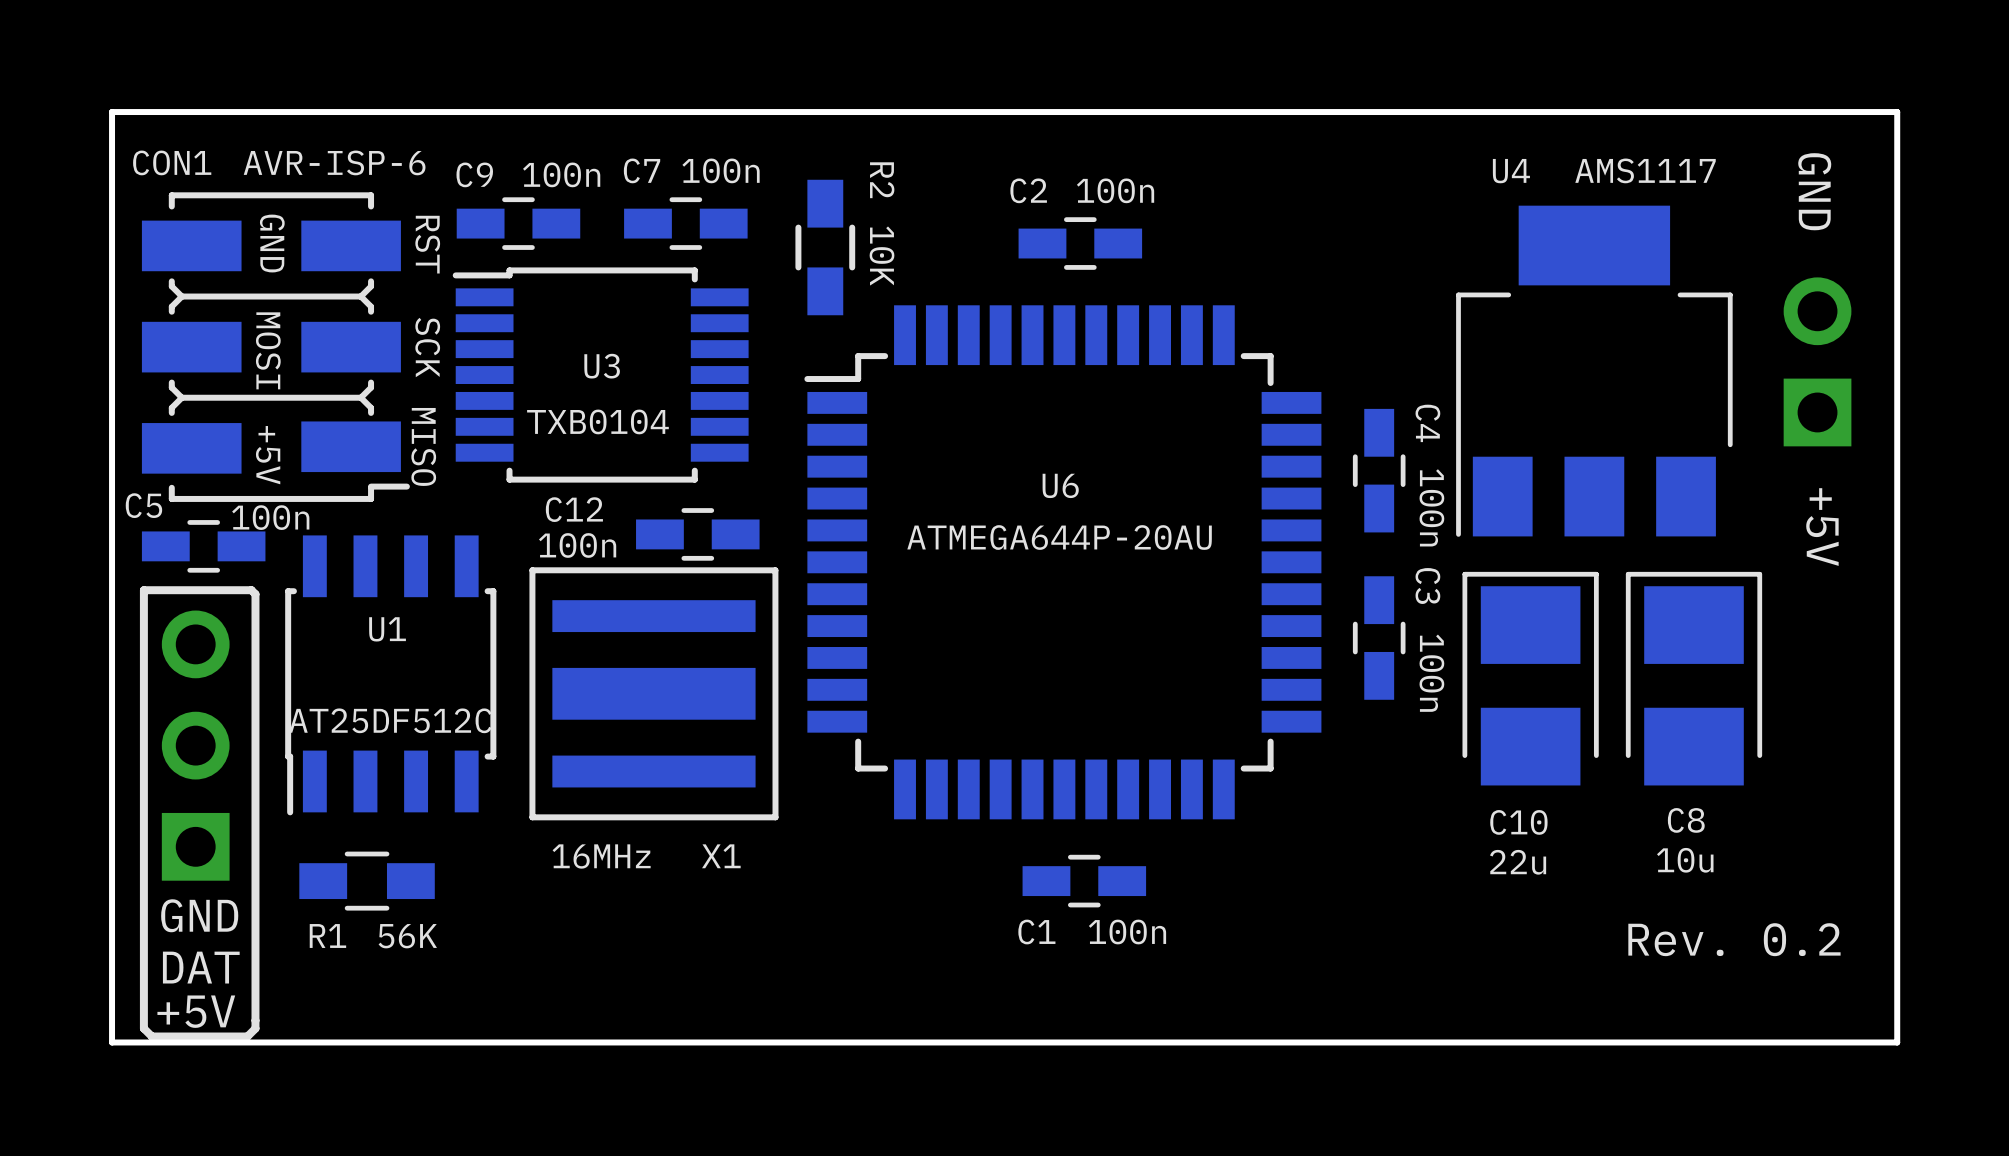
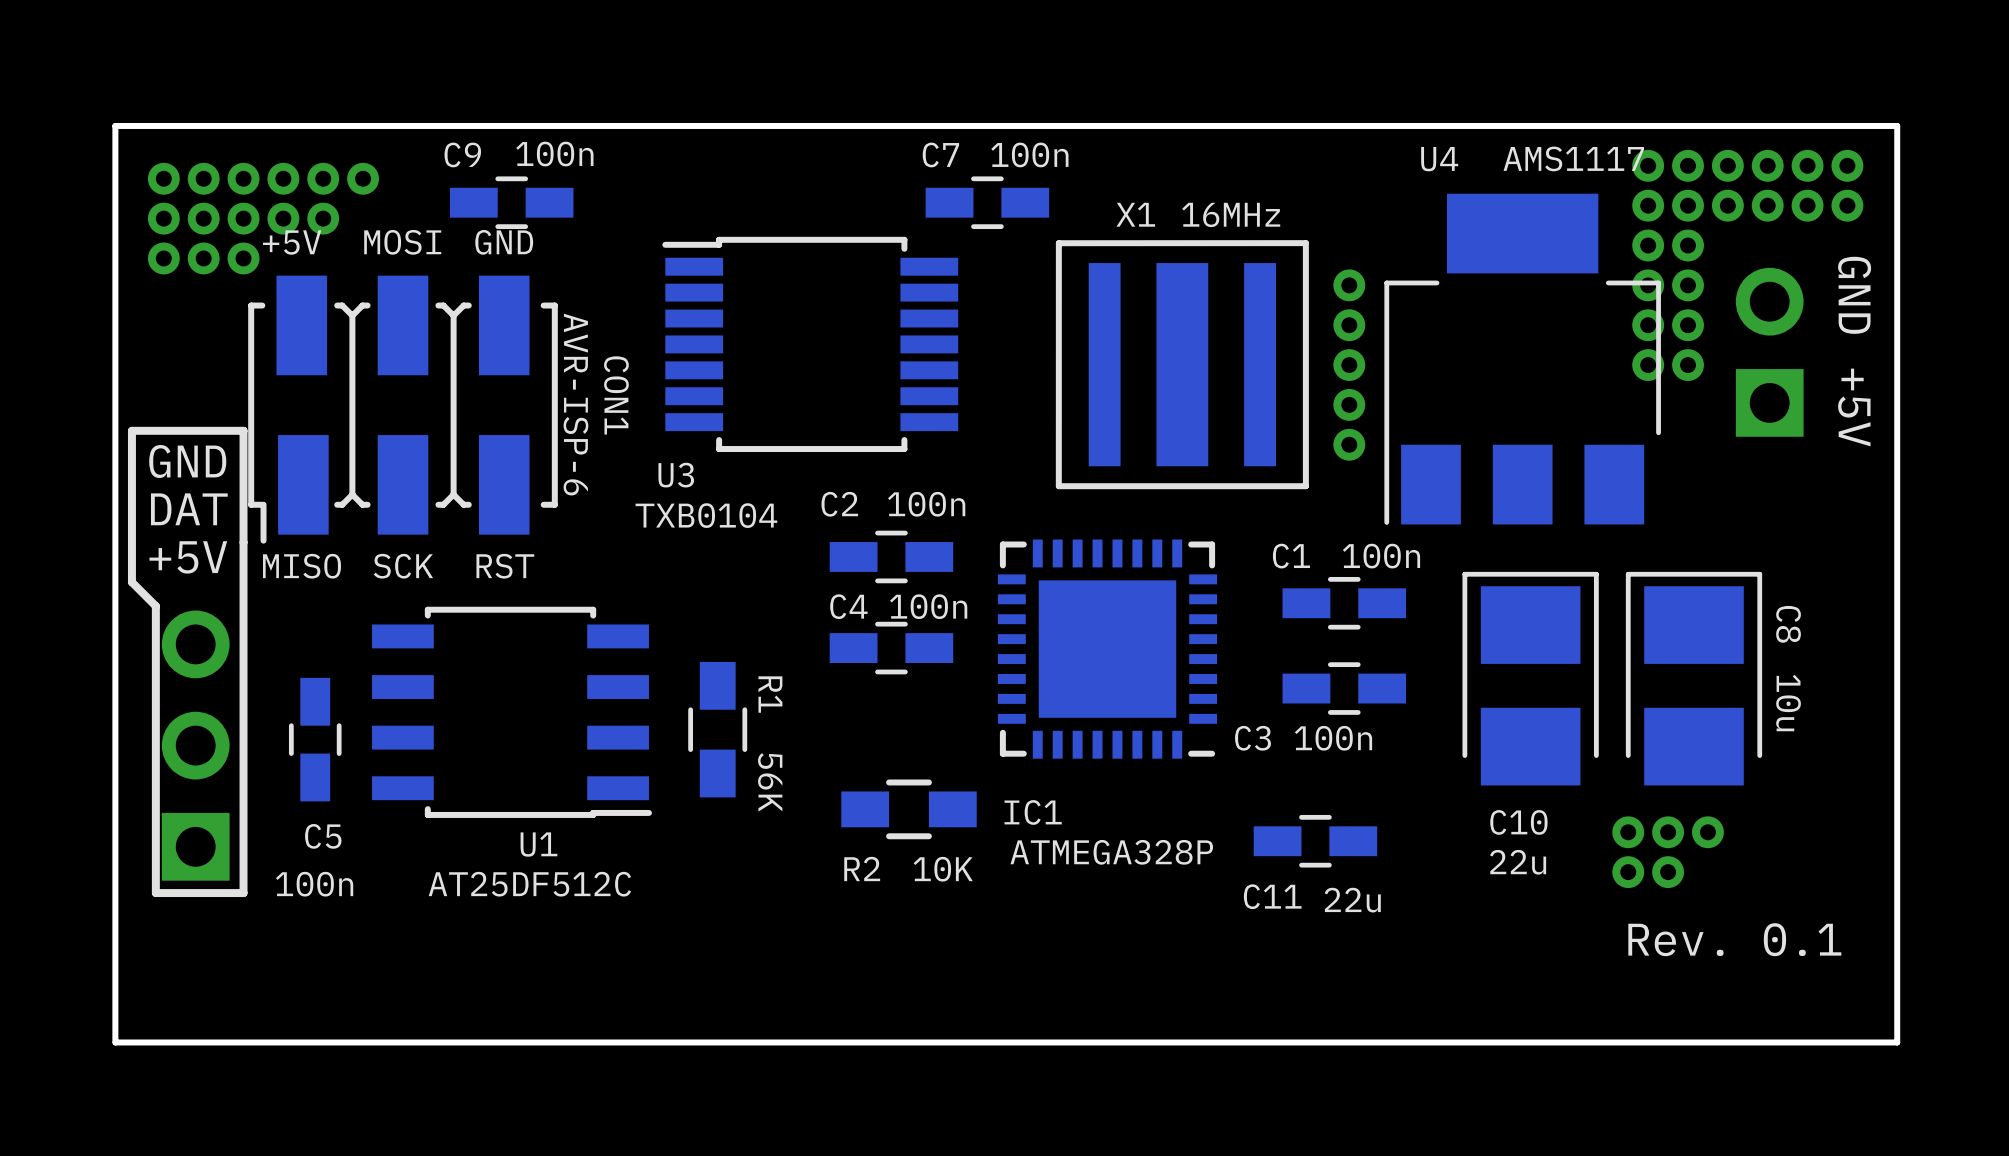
board edge: (1897, 125) (1897, 112) (112, 112) (112, 1042) (115, 1042) -> (1897, 125) (115, 125) (115, 1042)
CON1 name position: CON1 (172, 162) -> CON1 (616, 395)
part: none -> (1648, 165)
part: none -> (1688, 165)
part: none -> (1727, 165)
part: none -> (1767, 165)
part: none -> (1807, 165)
part: none -> (1847, 165)
C7 name position: C7 (642, 170) -> C7 (940, 154)
C7 value position: 100n (721, 170) -> 100n (1029, 154)
C9 name position: C9 (474, 174) -> C9 (462, 154)
part: none -> (163, 178)
part: none -> (203, 178)
part: none -> (243, 178)
part: none -> (283, 178)
part: none -> (323, 178)
part: none -> (363, 178)
R2 name position: R2 (882, 180) -> R2 (862, 869)
text position: GND (1814, 191) -> GND (1854, 295)
part: none -> (1648, 205)
part: none -> (1688, 205)
part: none -> (1727, 205)
part: none -> (1767, 205)
part: none -> (1807, 205)
part: none -> (1847, 205)
part: none -> (163, 218)
part: none -> (203, 218)
part: none -> (243, 218)
part: none -> (283, 218)
part: none -> (323, 218)
C9 position: (518, 223) -> (511, 202)
C7 position: (685, 223) -> (987, 202)
text: none -> GND (504, 242)
text: GND (272, 243) -> +5V (292, 242)
C2 position: (1080, 243) -> (891, 556)
text rotation: 0° (427, 244) -> 90° counterclockwise (505, 566)
text position: RST (427, 244) -> RST (505, 566)
part: none -> (1648, 245)
part: none -> (1688, 245)
R2 rotation: 0° (825, 247) -> 90° clockwise (908, 809)
R2 position: (825, 247) -> (908, 809)
part: none -> (163, 258)
part: none -> (203, 258)
part: none -> (243, 258)
part: none -> (1349, 285)
part: none -> (1648, 285)
part: none -> (1688, 285)
part: none -> (1349, 325)
part: none -> (1648, 325)
part: none -> (1688, 325)
CON1 rotation: 0° (275, 347) -> 90° clockwise (403, 409)
text rotation: 0° (427, 347) -> 90° counterclockwise (403, 566)
text position: SCK (427, 347) -> SCK (403, 566)
text rotation: 0° (268, 350) -> 90° counterclockwise (402, 242)
text position: MOSI (268, 350) -> MOSI (402, 242)
part position: (1817, 361) -> (1769, 352)
part: none -> (1349, 365)
part: none -> (1648, 365)
part: none -> (1688, 365)
U3 name position: U3 (602, 366) -> U3 (676, 475)
U4 position: (1594, 371) -> (1522, 359)
U3 position: (600, 375) -> (810, 344)
part: none -> (1349, 404)
U3 value position: TXB0104 (597, 421) -> TXB0104 (706, 515)
C4 name position: C4 (1427, 423) -> C4 (848, 606)
line: none -> (243, 430) (243, 893) (155, 893) (155, 606) (131, 582) (131, 430) (243, 430)
part: none -> (1349, 444)
text rotation: 0° (423, 446) -> 90° counterclockwise (301, 566)
text position: MISO (423, 446) -> MISO (301, 566)
text: +5V (268, 455) -> none
text: none -> GND (187, 461)
C4 rotation: 0° (1379, 470) -> 90° clockwise (891, 648)
C4 position: (1379, 470) -> (891, 648)
C5 name position: C5 (143, 505) -> C5 (323, 836)
C5 value position: 100n (270, 517) -> 100n (314, 884)
text position: +5V (1822, 527) -> +5V (1854, 407)
C12: 100n (697, 534) -> none
C5 rotation: 0° (203, 546) -> 90° clockwise (315, 739)
C5 position: (203, 546) -> (315, 739)
text: none -> +5V (188, 557)
U6: ATMEGA644P-20AU (1062, 562) -> none
C3 name position: C3 (1427, 586) -> C3 (1252, 738)
line: (251, 590) (255, 594) (255, 1028) (247, 1036) (151, 1036) (143, 1028) (143, 590) (251, 590) -> none
U1 name position: U1 (387, 629) -> U1 (538, 844)
C3 rotation: 0° (1379, 638) -> 90° clockwise (1344, 688)
IC1: none -> ATMEGA328P (1107, 649)
U1 rotation: 0° (390, 675) -> 90° counterclockwise (512, 712)
X1 rotation: 0° (653, 693) -> 90° clockwise (1182, 364)
X1 position: (653, 693) -> (1182, 364)
U1 value position: AT25DF512C (390, 720) -> AT25DF512C (529, 884)
C8 name rotation: 0° (1686, 820) -> 90° clockwise (1788, 624)
C8 name position: C8 (1686, 820) -> C8 (1788, 624)
part: none -> (1628, 832)
part: none -> (1668, 832)
part: none -> (1707, 832)
C11: none -> 22u (1315, 841)
X1 value position: 16MHz (601, 856) -> 16MHz (1231, 214)
X1 name position: X1 (721, 856) -> X1 (1135, 214)
C8 value rotation: 0° (1685, 860) -> 90° clockwise (1788, 703)
C8 value position: 10u (1685, 860) -> 10u (1788, 703)
part: none -> (1628, 872)
part: none -> (1668, 872)
R1 rotation: 0° (367, 881) -> 90° clockwise (717, 729)
R1 position: (367, 881) -> (717, 729)
C1 position: (1084, 881) -> (1344, 603)
text: GND (199, 915) -> none
C1 name position: C1 (1036, 932) -> C1 (1291, 556)
C1 value position: 100n (1127, 932) -> 100n (1381, 556)
R1 name position: R1 (327, 935) -> R1 (770, 694)
text: Rev. 0.2 (1734, 939) -> Rev. 0.1 (1734, 939)
text position: DAT (201, 967) -> DAT (189, 509)
text: +5V (196, 1011) -> none

